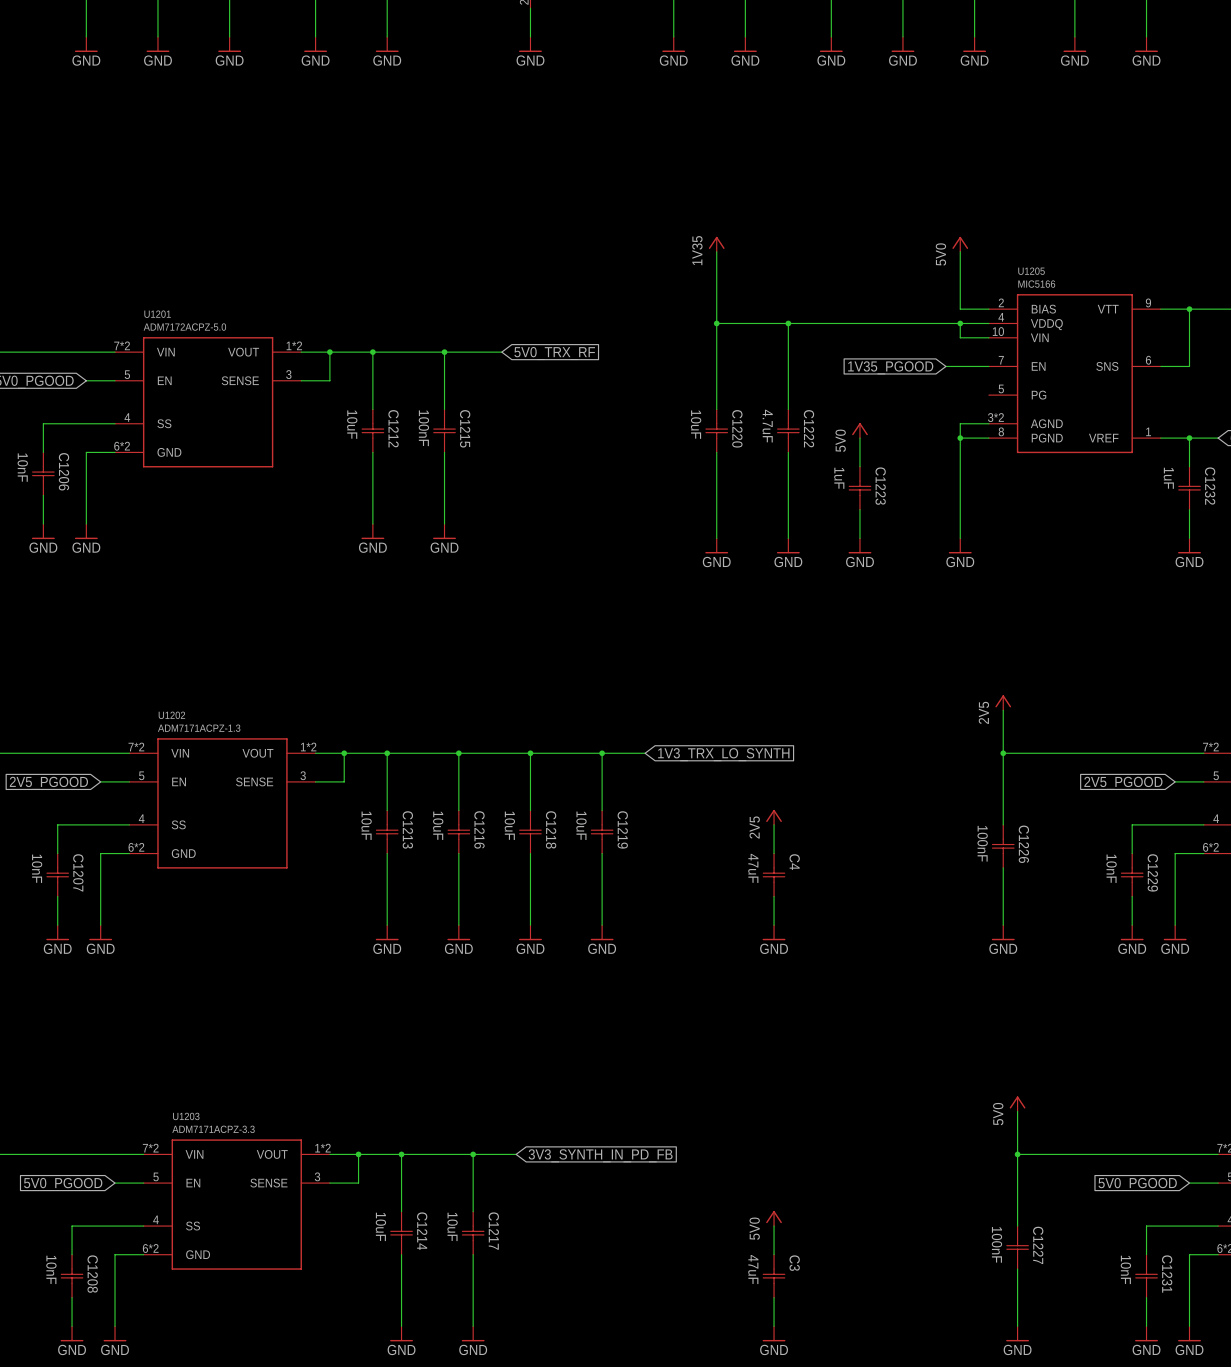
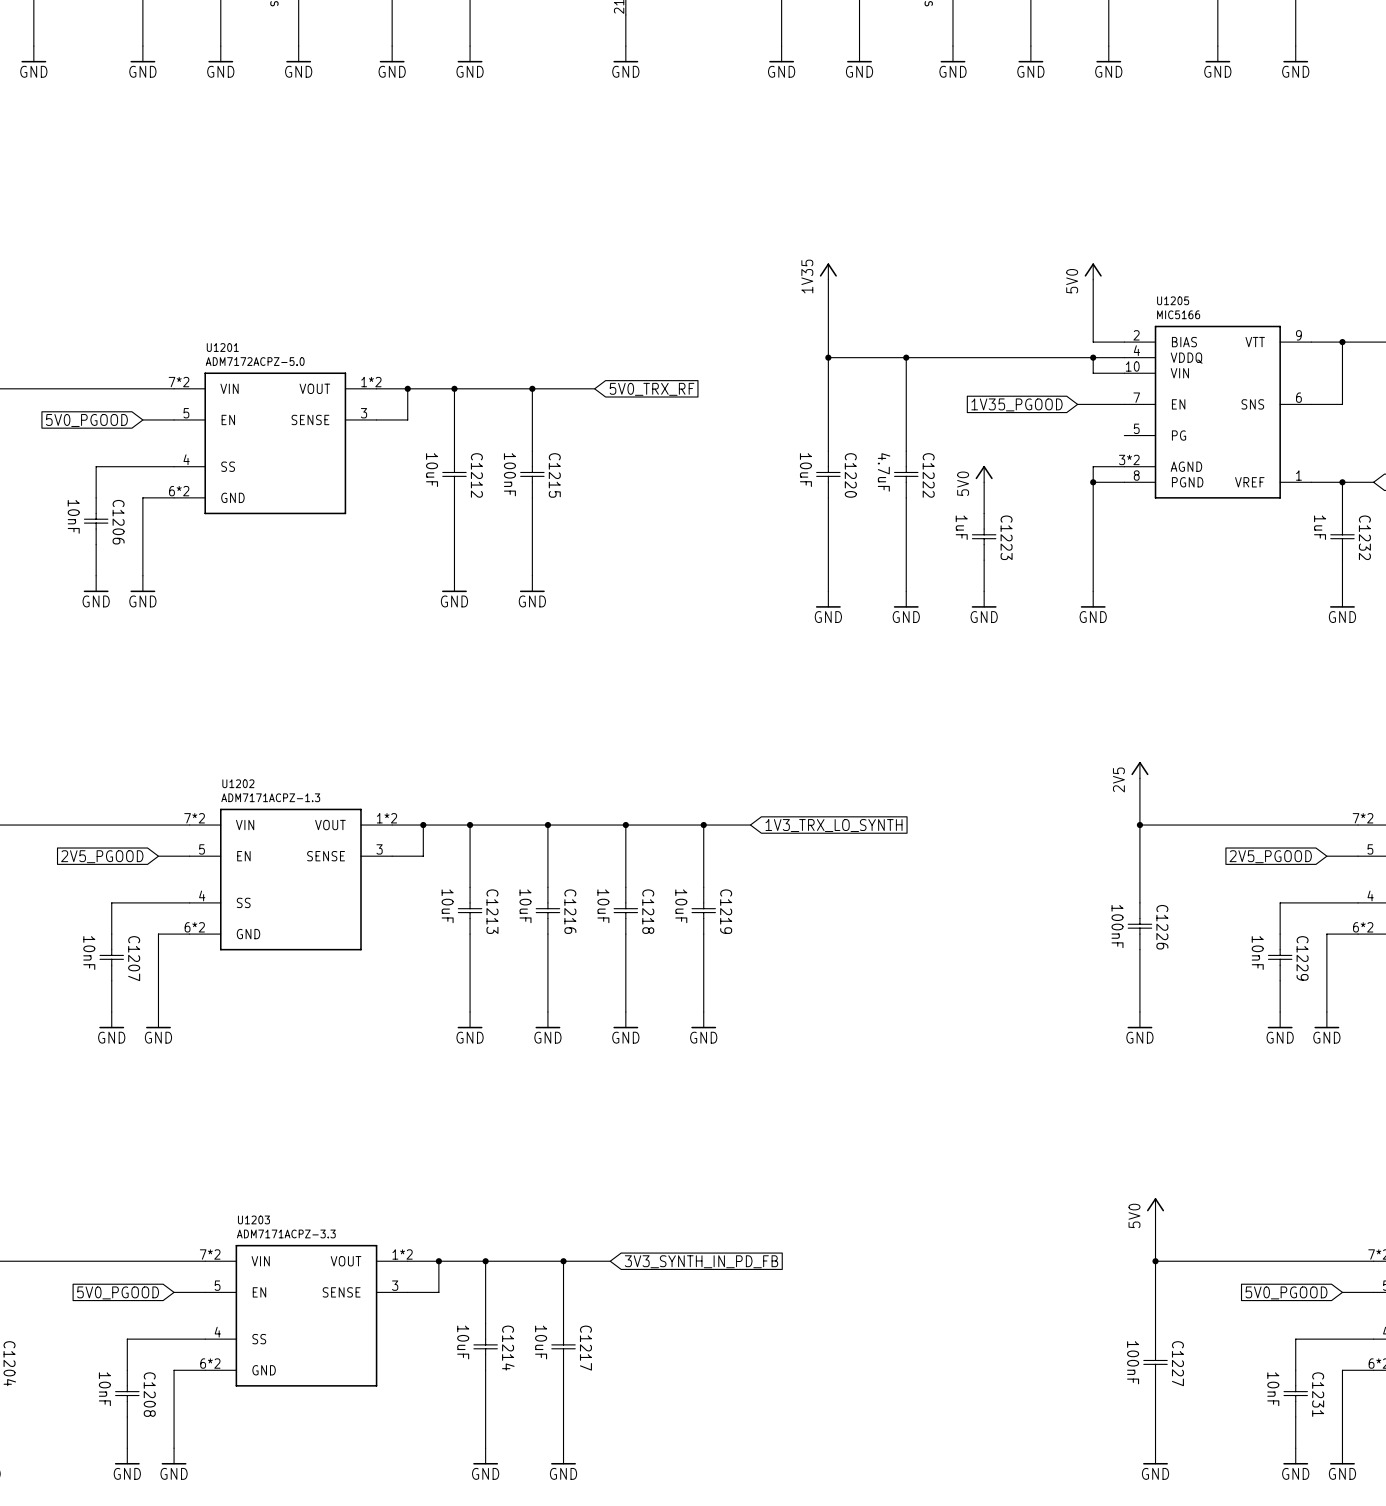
power symbol: 2V5 (774, 817) -> none
wire: (774, 824) (774, 853) -> none
C4: 47uF (774, 875) -> none
wire: (774, 896) (774, 925) -> none
power symbol: GND (774, 932) -> none
power symbol: 5V0 (774, 1218) -> none
wire: (774, 1226) (774, 1254) -> none
C3: 47uF (774, 1276) -> none
wire: (774, 1297) (774, 1326) -> none
power symbol: GND (774, 1333) -> none

